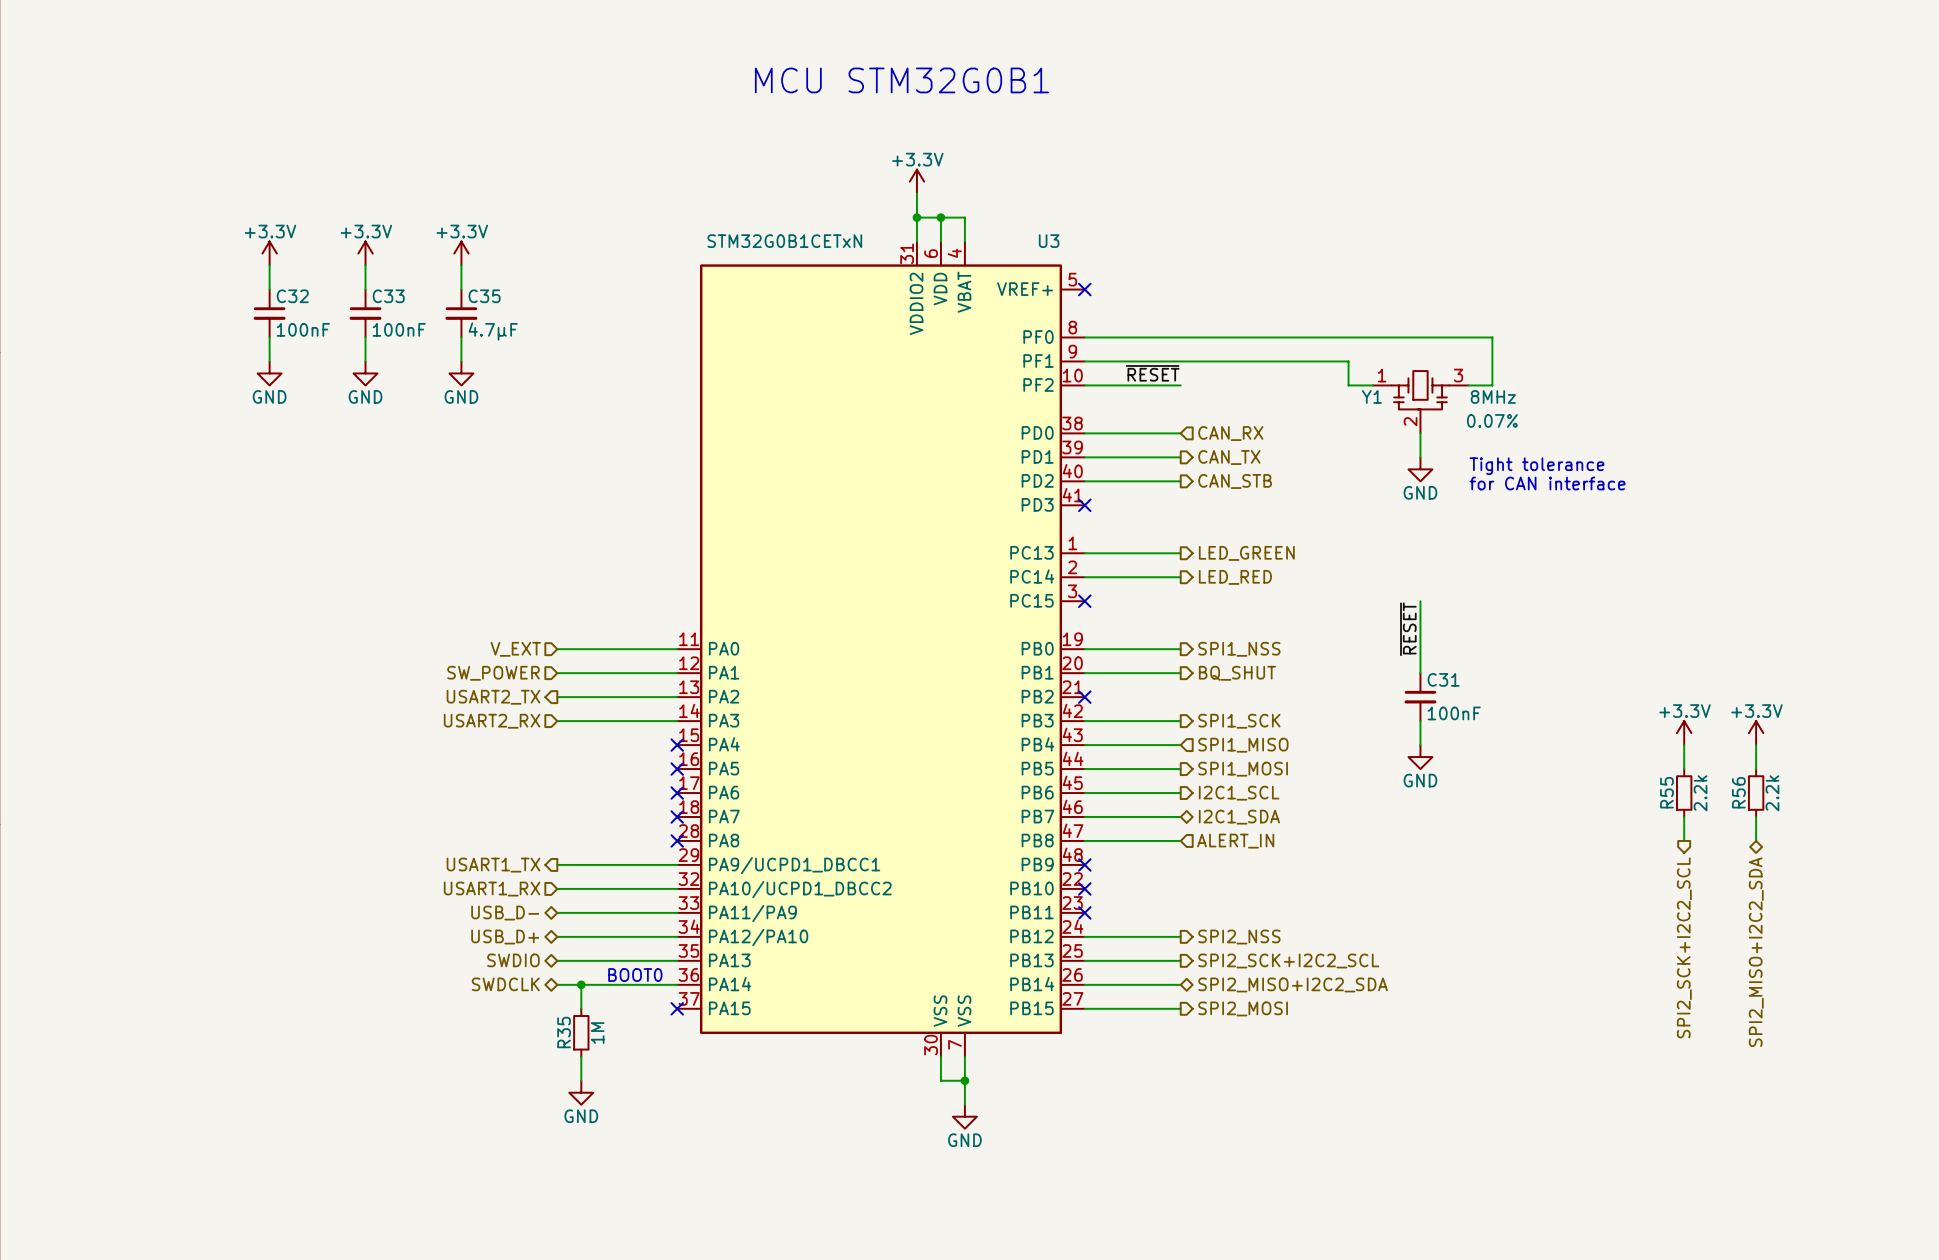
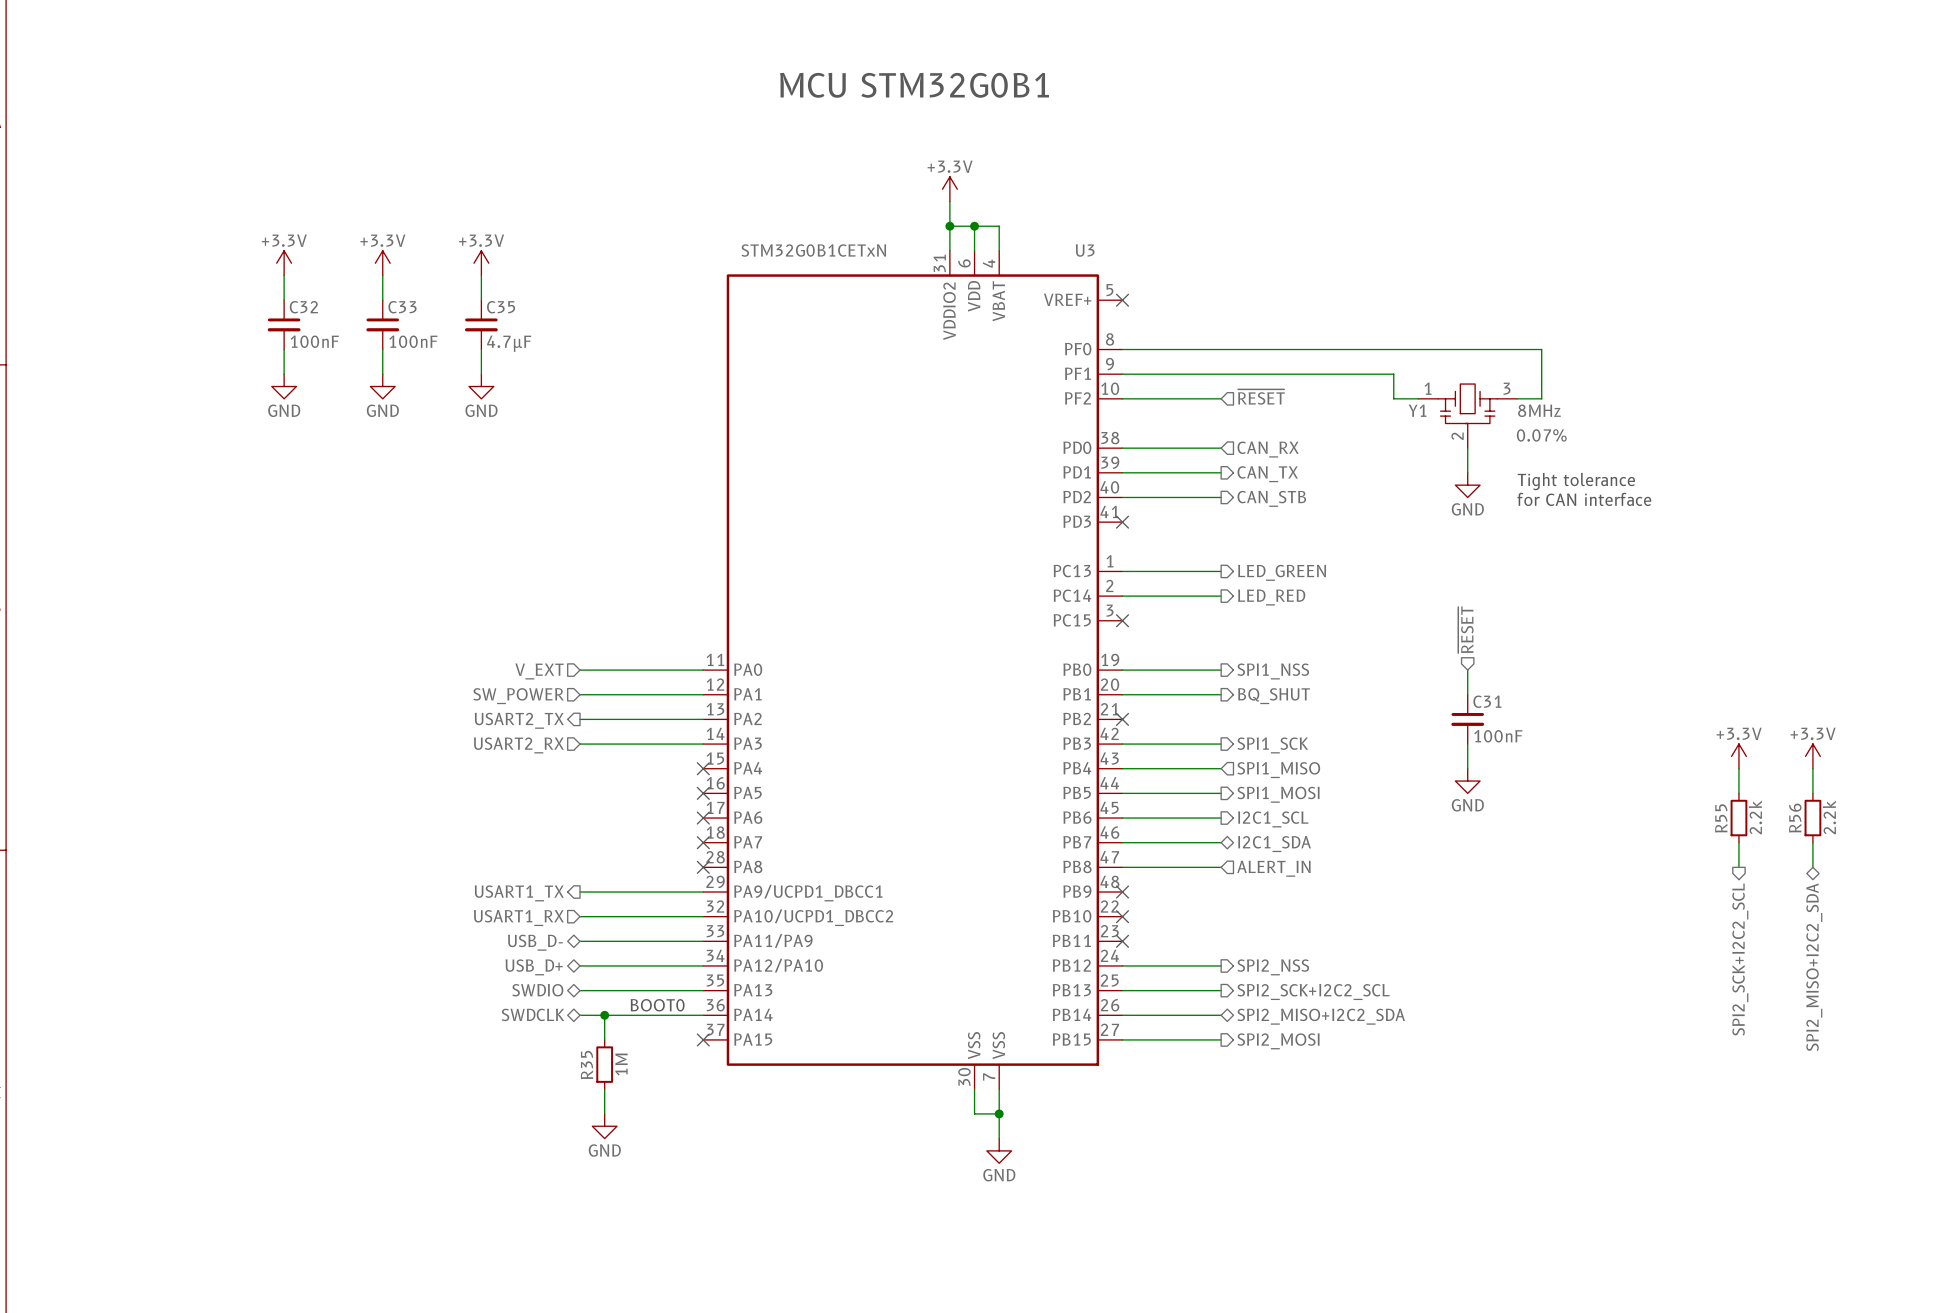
label: ~{RESET} (1152, 373) -> none
hierarchical label: none -> ~{RESET} (1261, 397)
wire: (1420, 601) (1420, 649) -> none
hierarchical label: none -> ~{RESET} (1465, 629)
label: ~{RESET} (1408, 629) -> none

